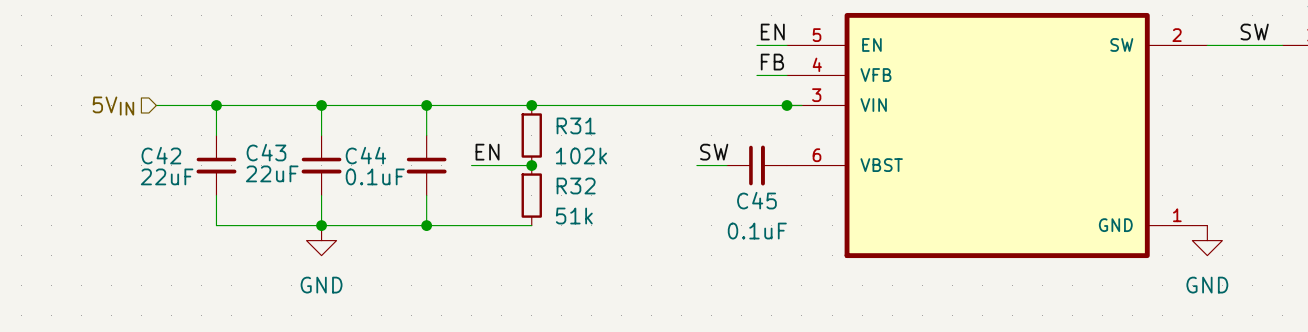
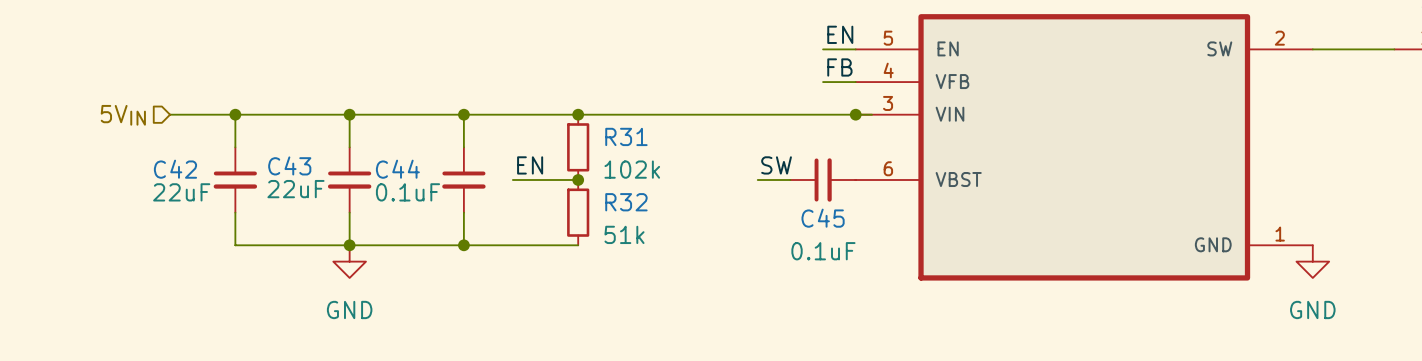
label: SW (1254, 32) -> none

